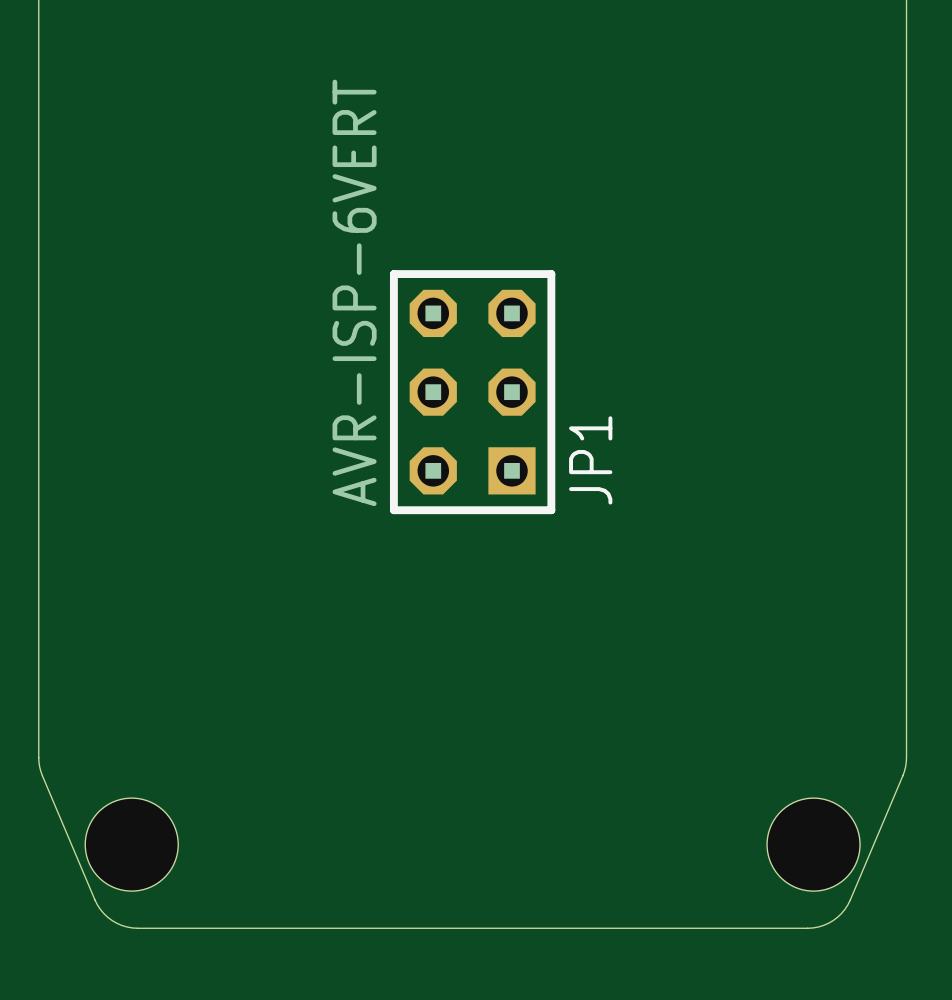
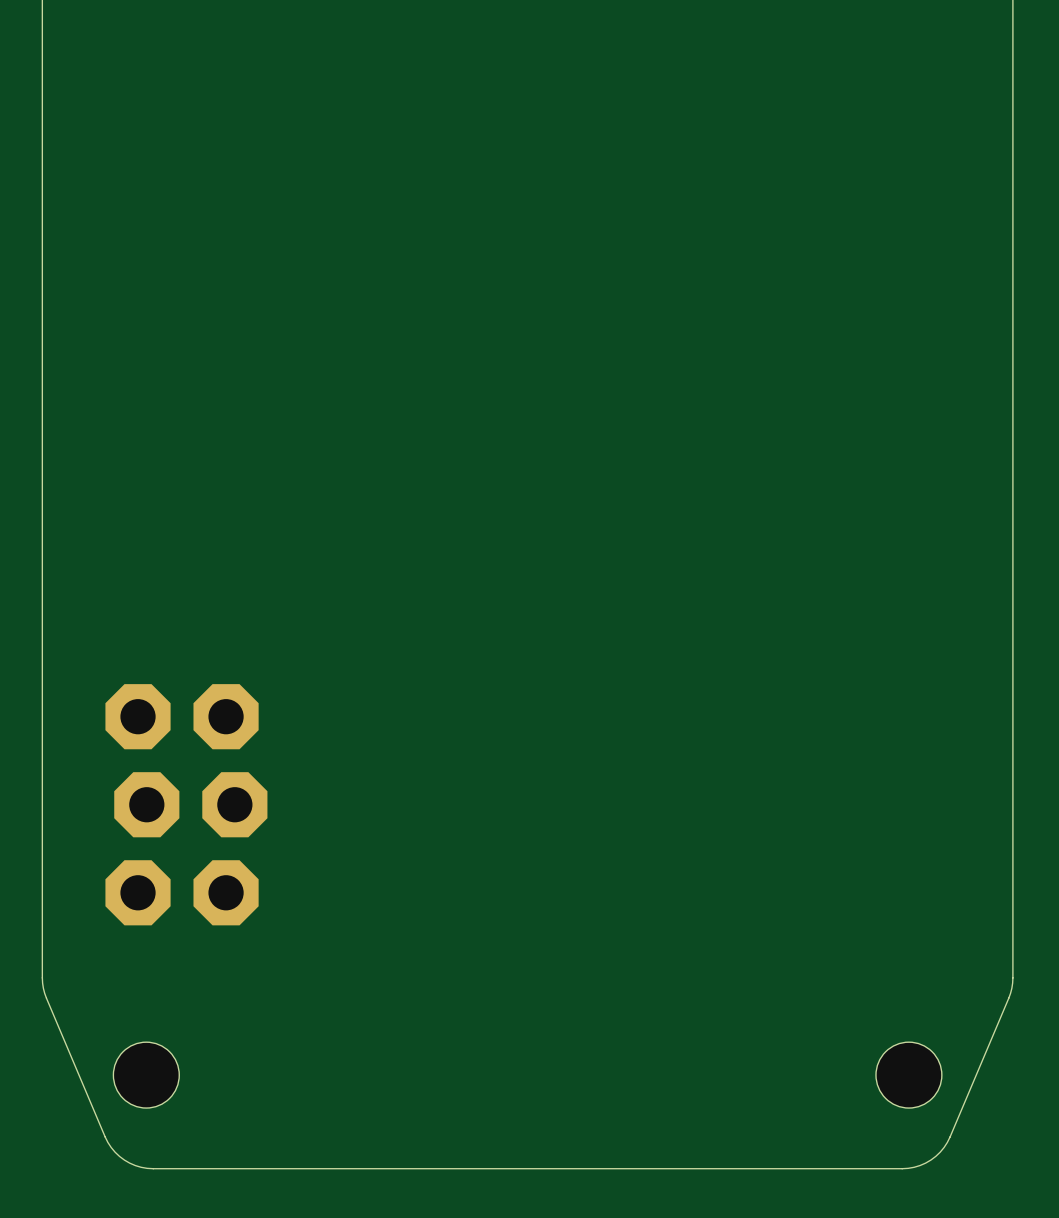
JP1: AVR-ISP-6VERT (472, 392) -> none
part: none -> (186, 804)
hole size: [85, 798, 179, 892] -> [113, 1042, 180, 1109]
hole size: [767, 798, 861, 892] -> [875, 1042, 942, 1109]

